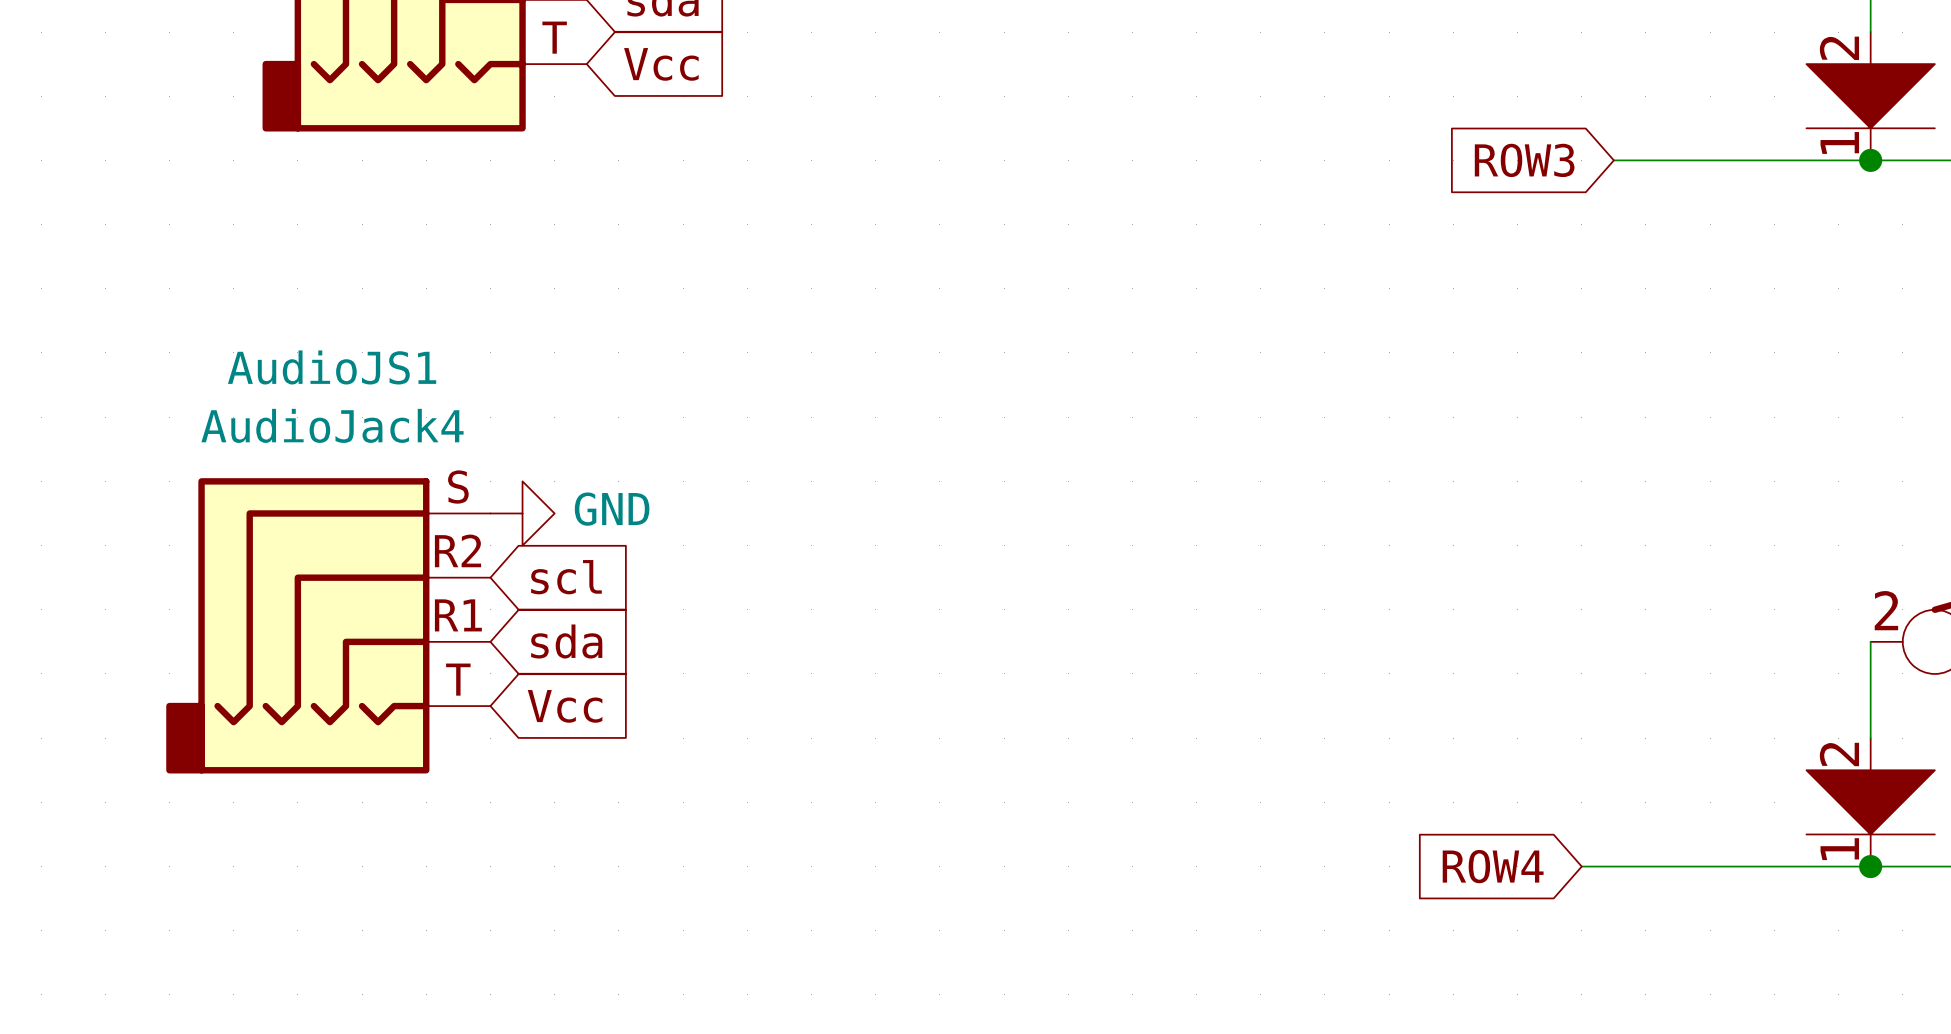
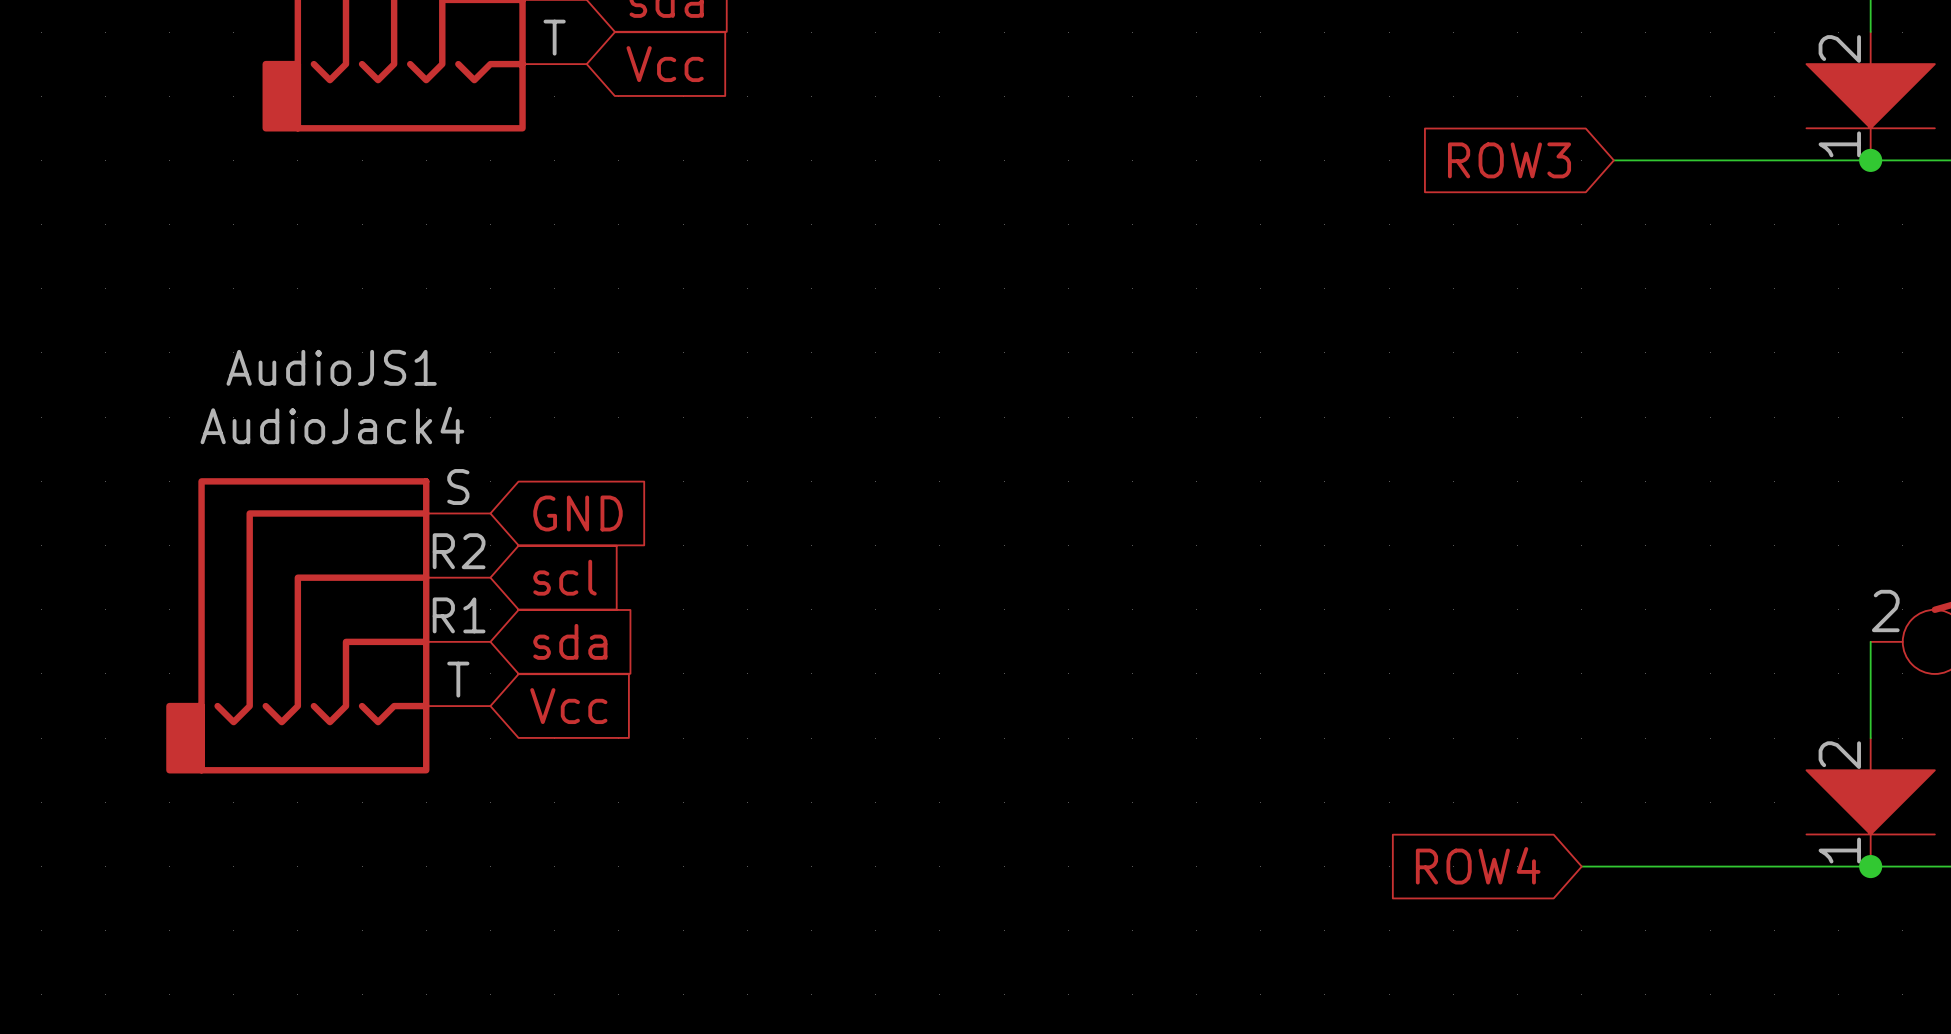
power symbol: GND (522, 513) -> none
global label: none -> GND (577, 513)

